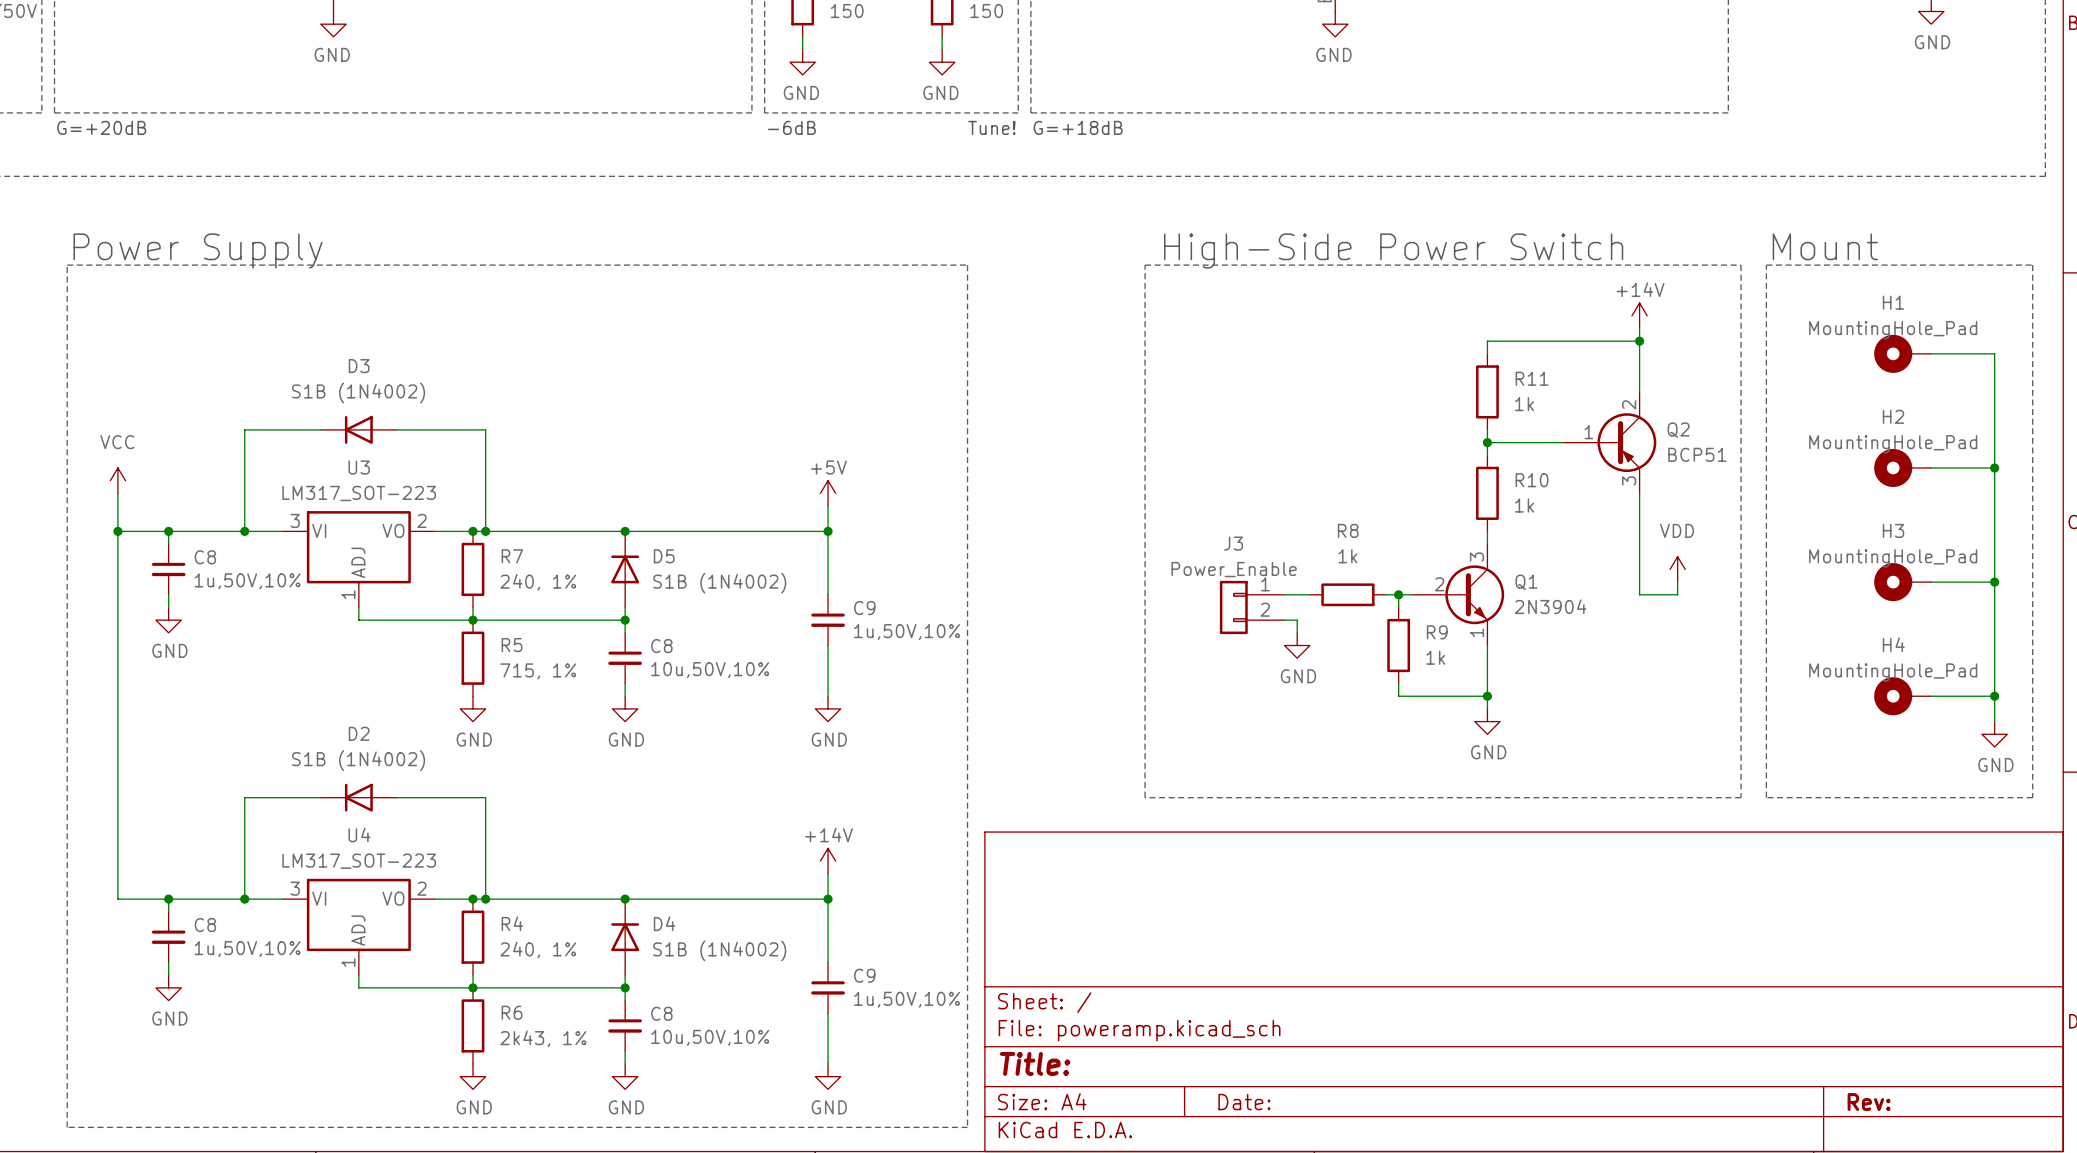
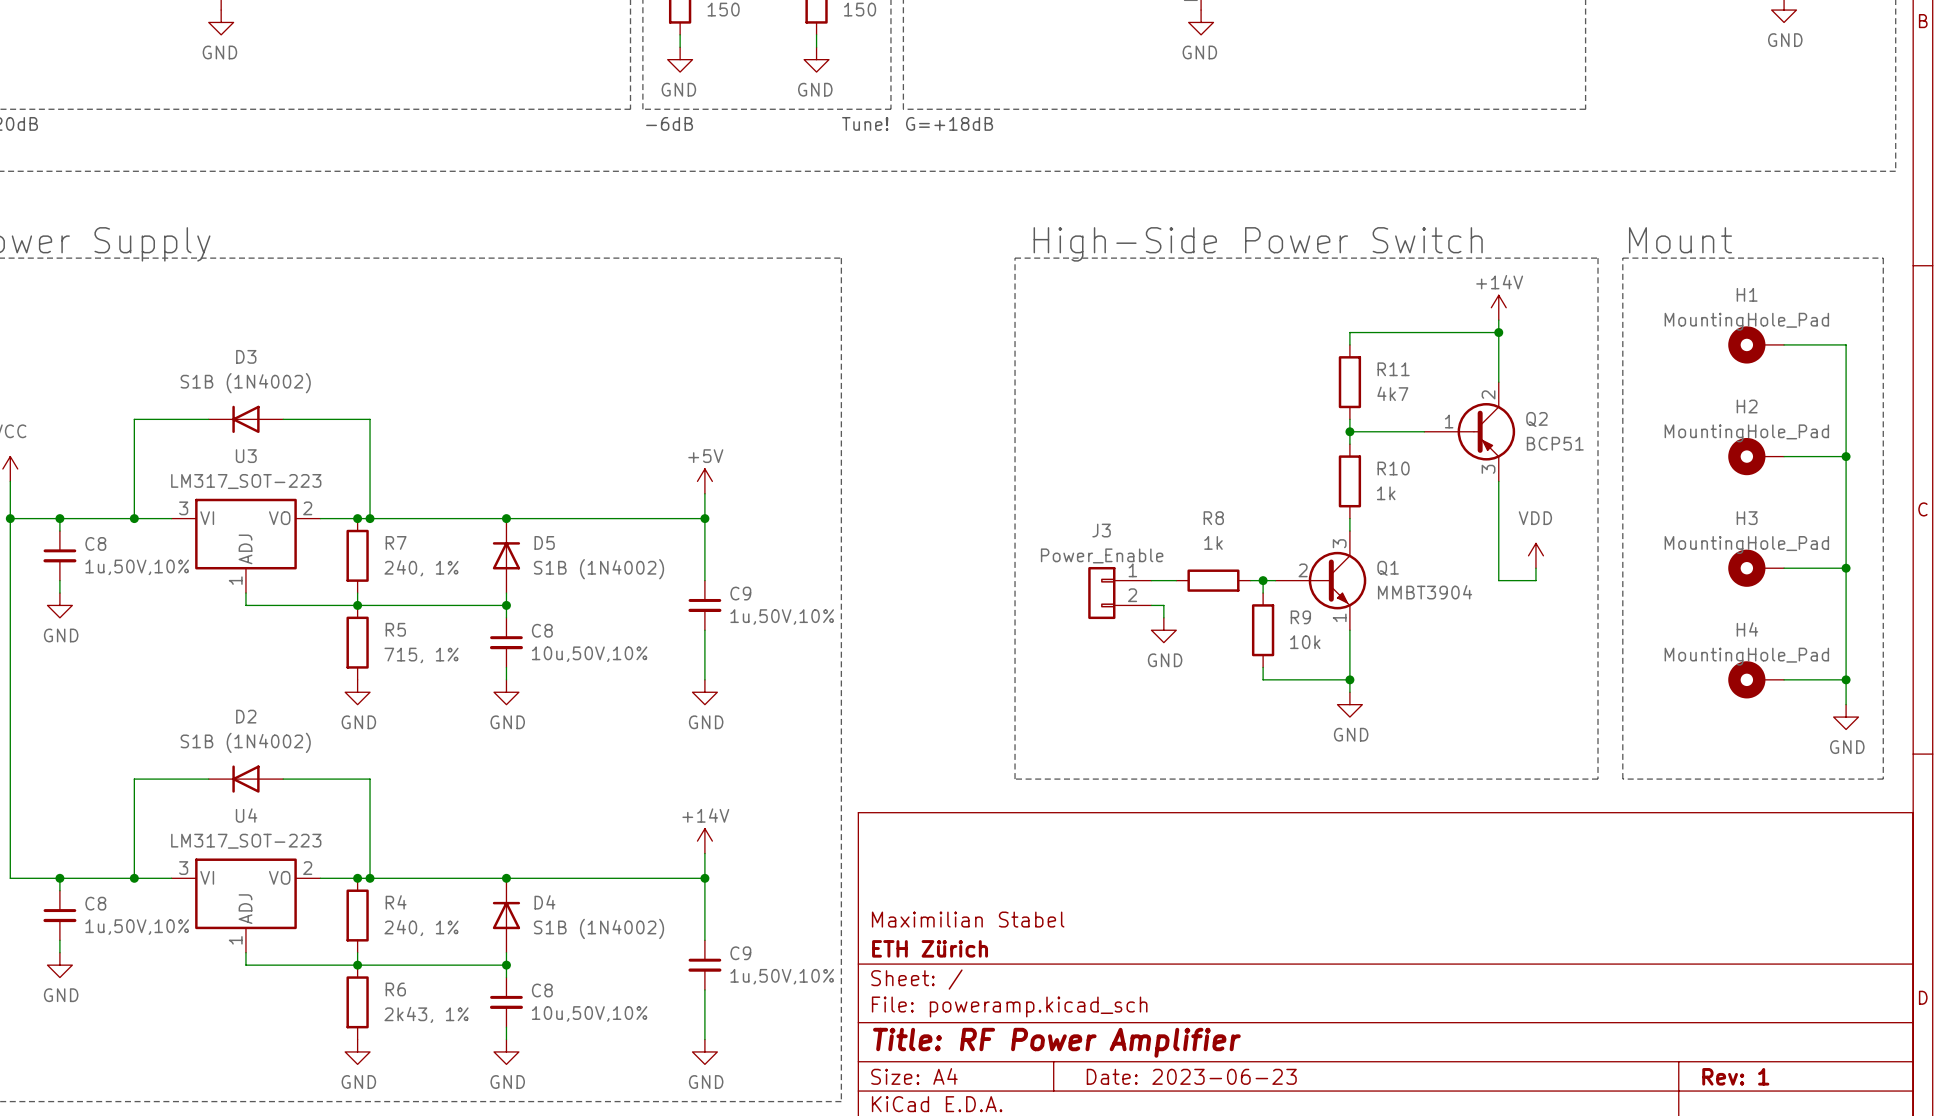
R11 value: 1k (1524, 404) -> 4k7 (1392, 393)
Q1 value: 2N3904 (1550, 606) -> MMBT3904 (1425, 592)
R9 value: 1k (1435, 657) -> 10k (1305, 642)
title block: none -> Maximilian Stabel (968, 919)
title block: none -> ETH Zürich (930, 948)
title block: Title: (1035, 1063) -> Title: RF Power Amplifier (1056, 1042)
title block: Date: (1244, 1102) -> Date: 2023-06-23 (1191, 1076)
title block: Rev: (1869, 1102) -> Rev: 1 (1735, 1076)

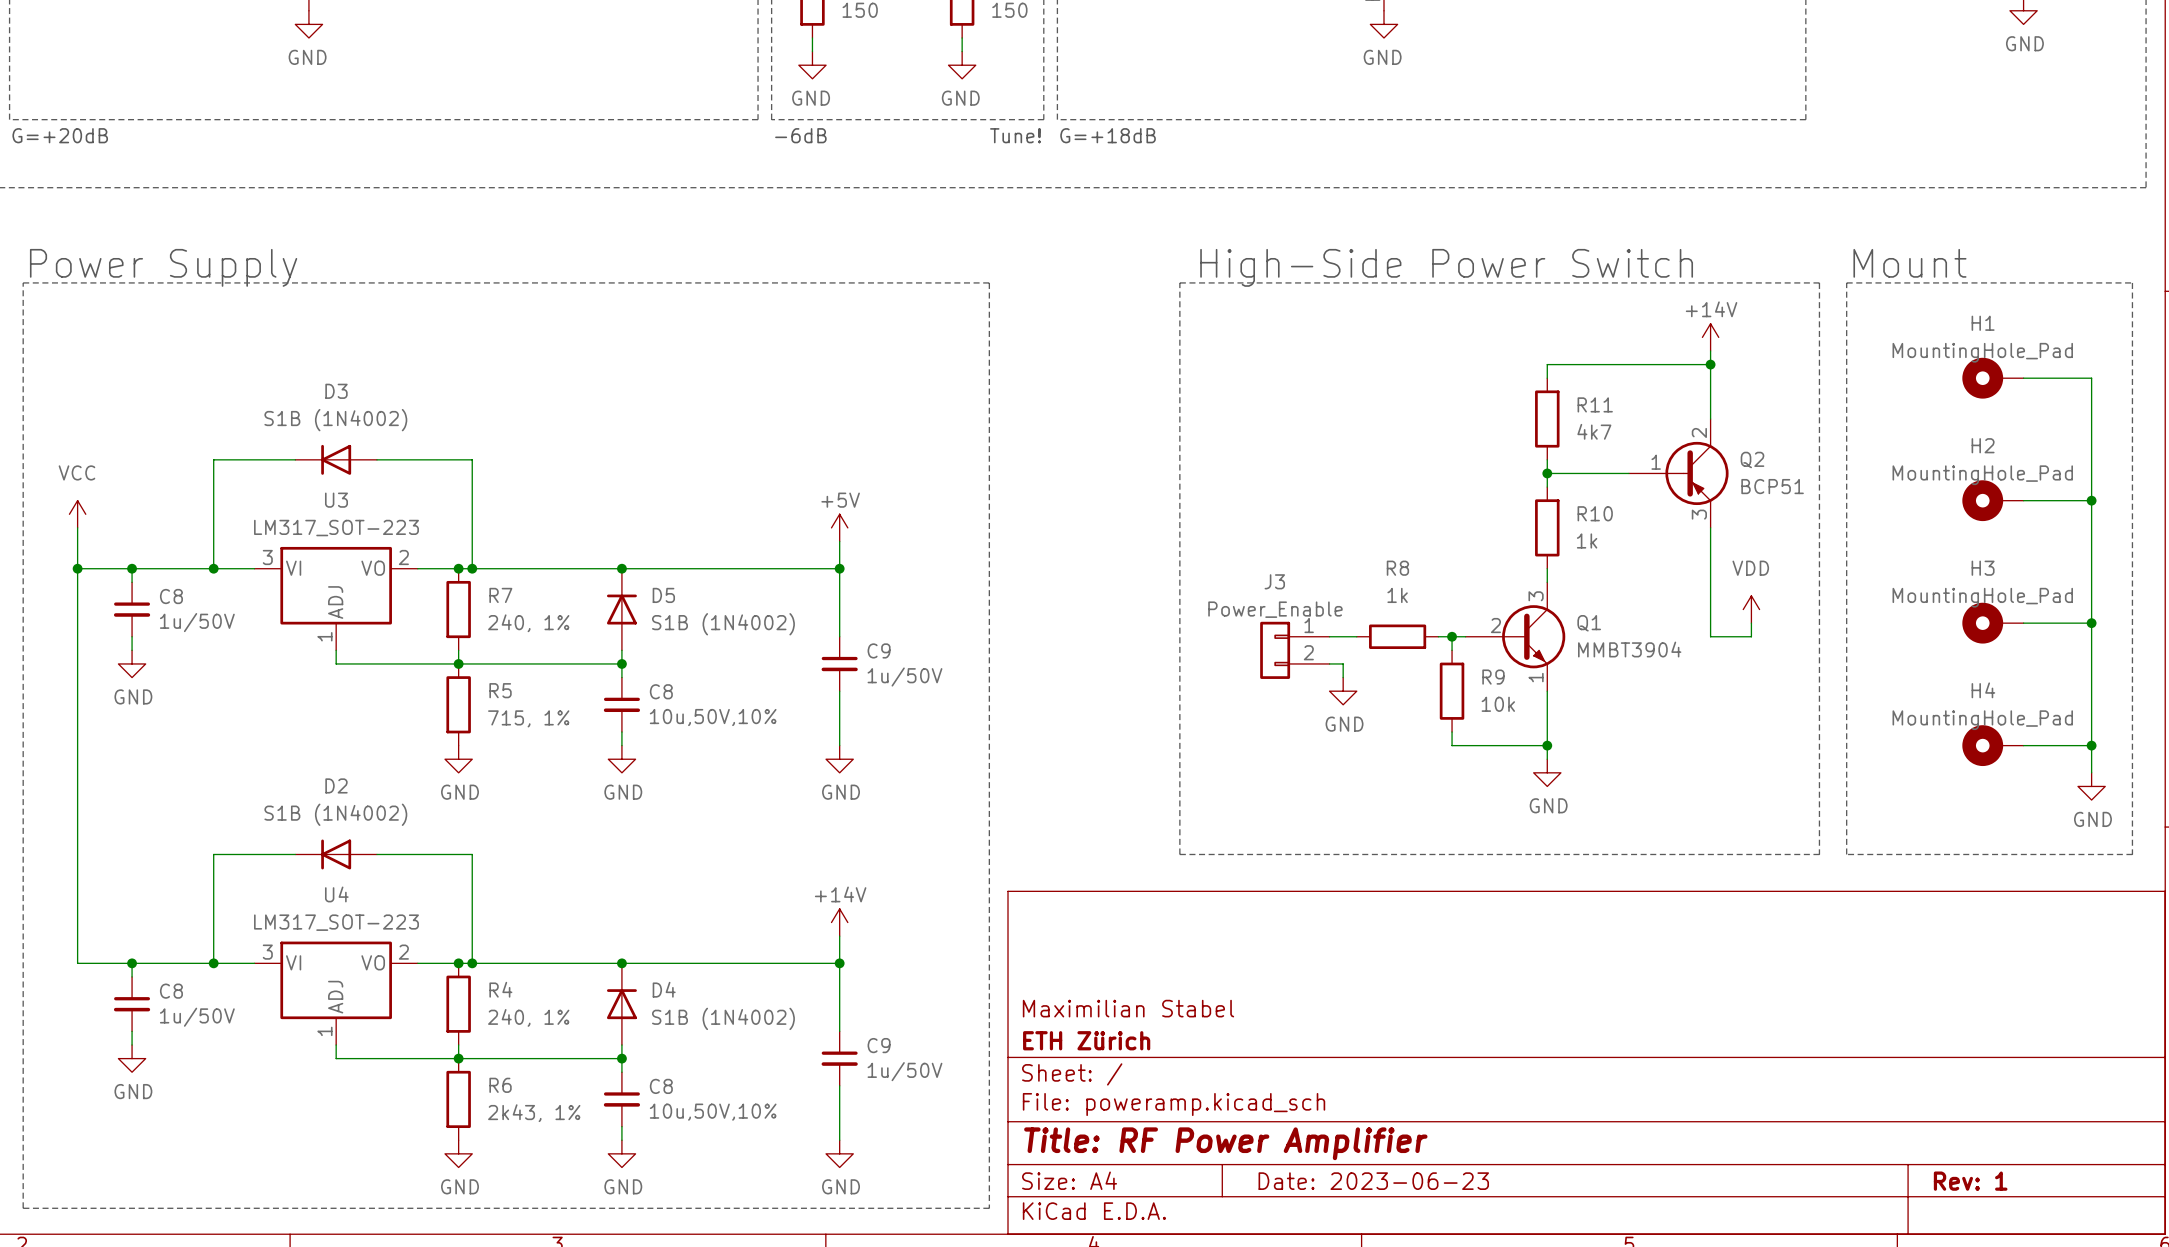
C8 value: 1u,50V,10% (137, 567) -> 1u/50V (197, 622)
C9 value: 1u,50V,10% (782, 617) -> 1u/50V (904, 677)
C8 value: 1u,50V,10% (137, 927) -> 1u/50V (197, 1017)
C9 value: 1u,50V,10% (782, 976) -> 1u/50V (904, 1071)

